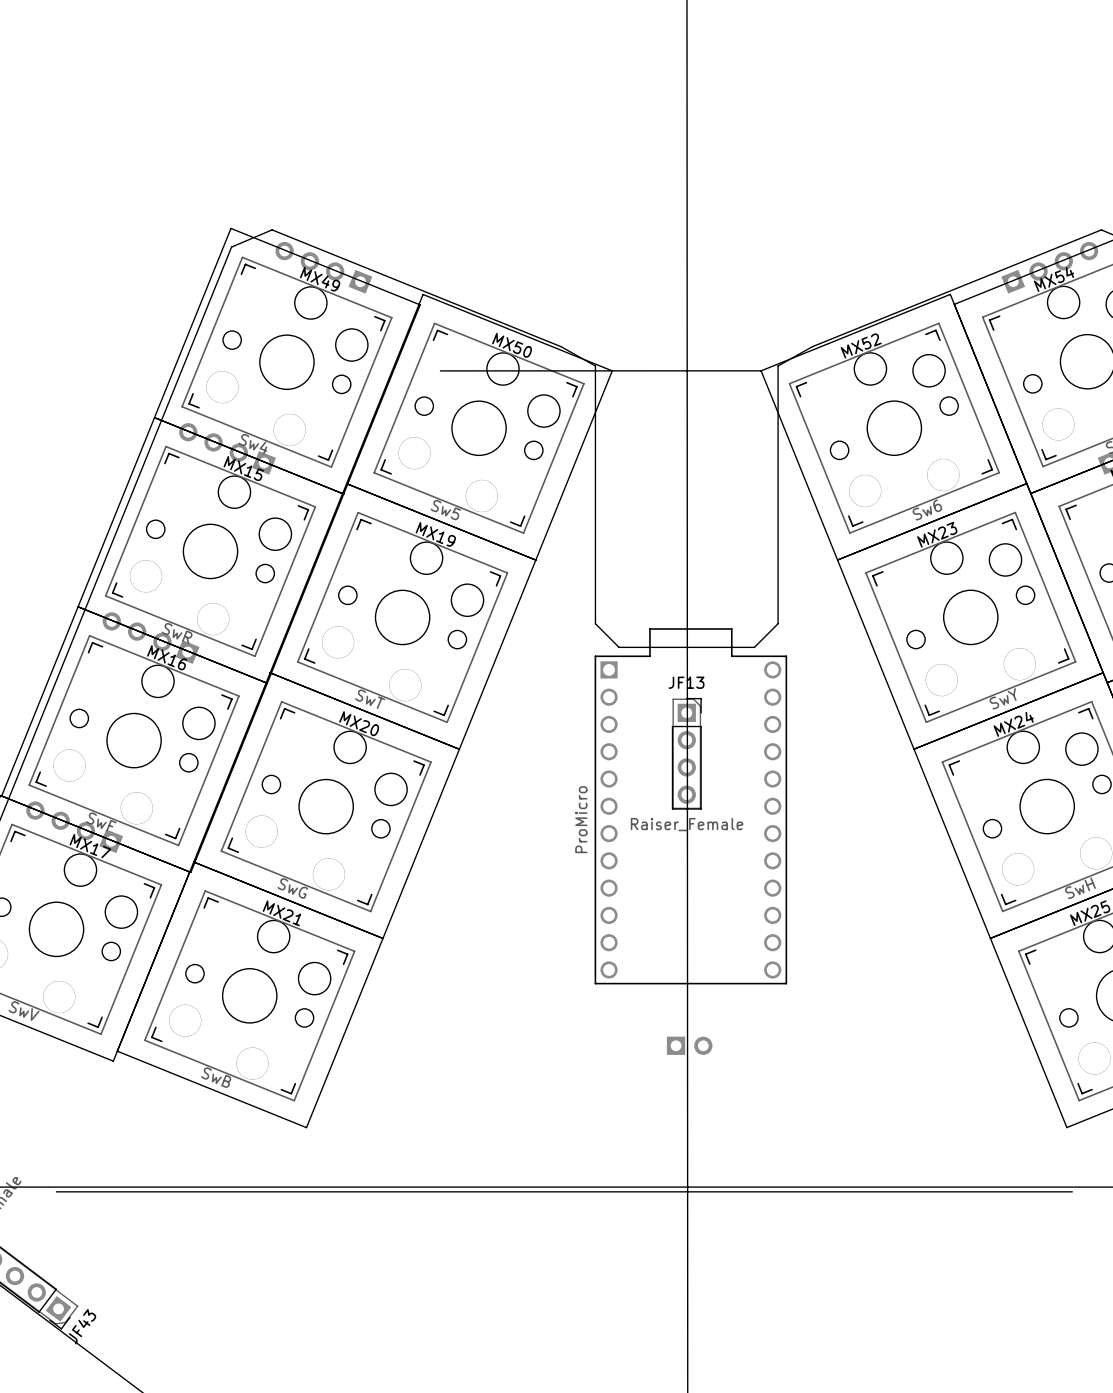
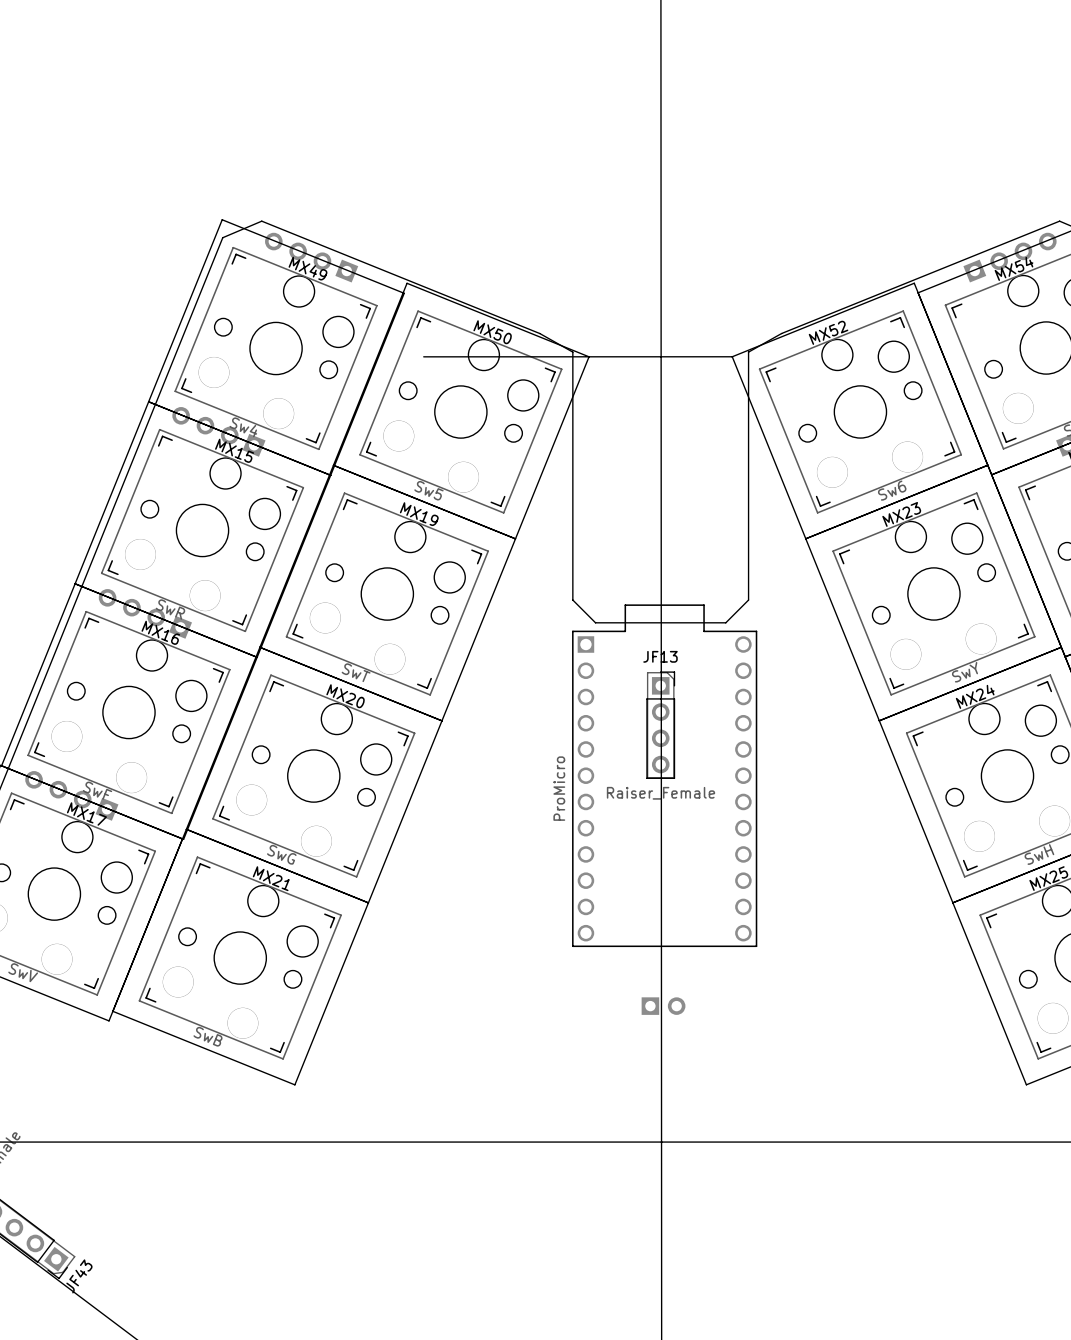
line: (56, 1191) (1072, 1191) -> none

